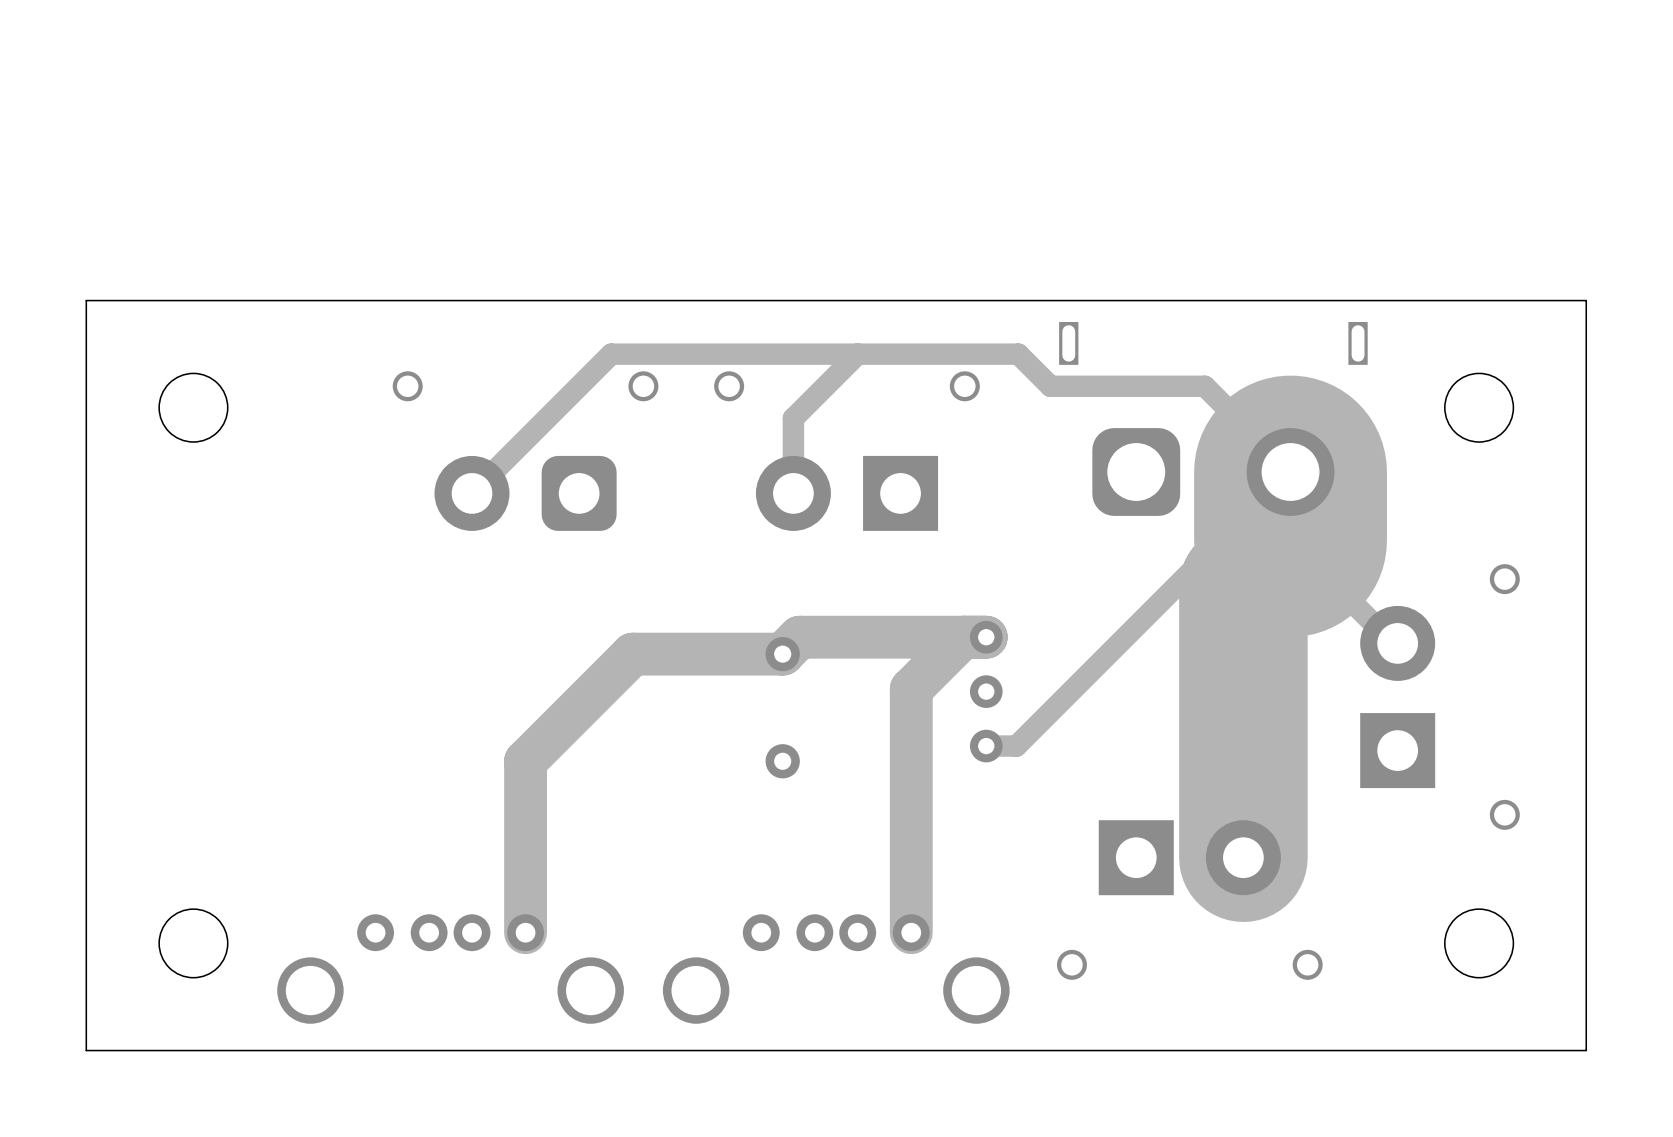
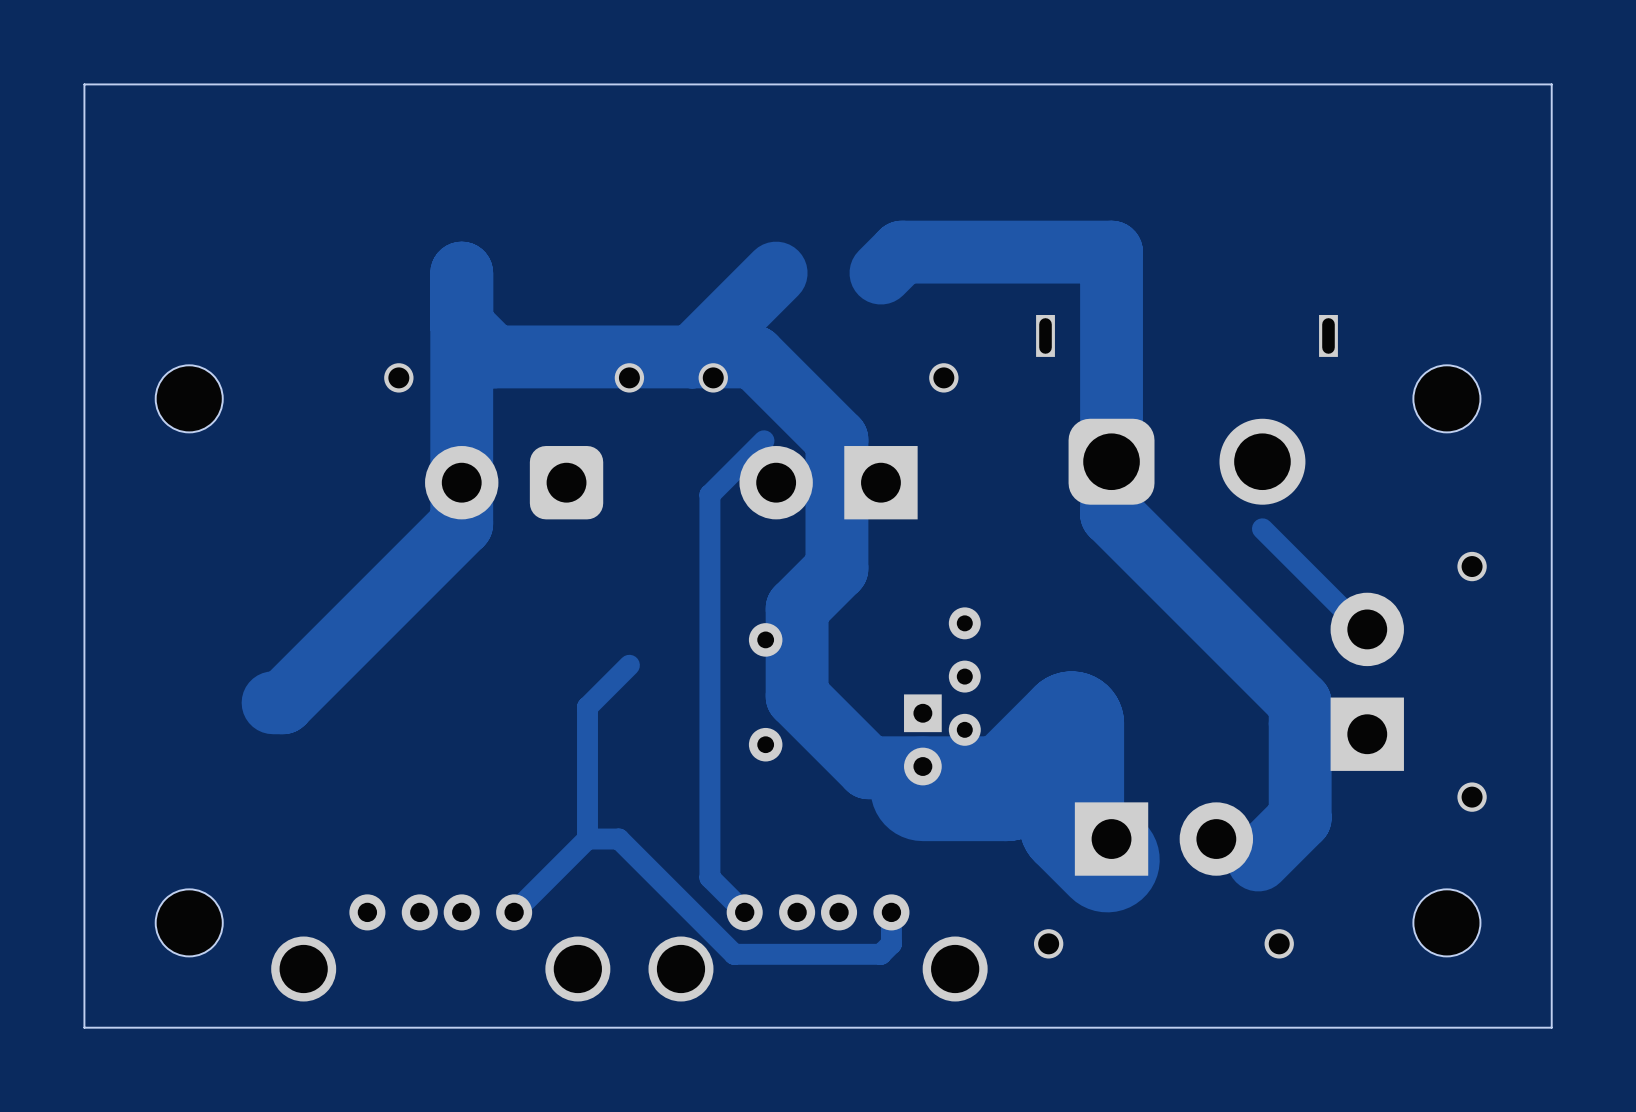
track: none -> (461, 273) (461, 523) (282, 702) (273, 702)
track: none -> (776, 273) (692, 356)
track: none -> (880, 273) (901, 252) (1111, 252) (1111, 514) (1300, 702) (1300, 818) (1258, 860)
board edge: (1586, 300) (86, 300) -> (1551, 294) (1551, 84) (84, 84) (84, 294)
track: none -> (461, 324) (493, 356) (754, 356) (836, 439) (836, 568) (797, 608) (797, 696) (868, 767) (922, 767)
track: (857, 354) (793, 418) (793, 493) -> none
track: none -> (763, 440) (709, 494) (709, 877) (744, 912)
track: (1290, 472) (1016, 746) (986, 746) -> none
track: (1290, 472) (1204, 386) (1050, 386) (1018, 354) (611, 354) (472, 493) -> none
track: (1290, 472) (1290, 540) (1243, 587) (1243, 857) -> none
track: (963, 637) (911, 689) (911, 932) -> (587, 839) (618, 839) (734, 954) (880, 954) (891, 943) (891, 912)
track: (986, 637) (799, 637) (782, 654) (632, 654) (525, 761) (525, 932) -> (587, 839) (514, 912)
track: none -> (629, 665) (587, 707) (587, 839)
part: none -> (922, 739)
track: none -> (922, 788) (1006, 788) (1071, 723) (1071, 824) (1107, 860)

